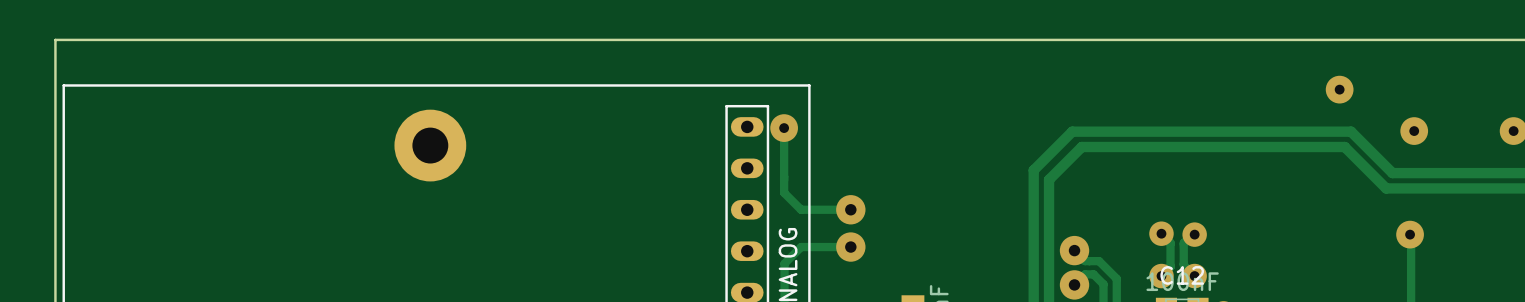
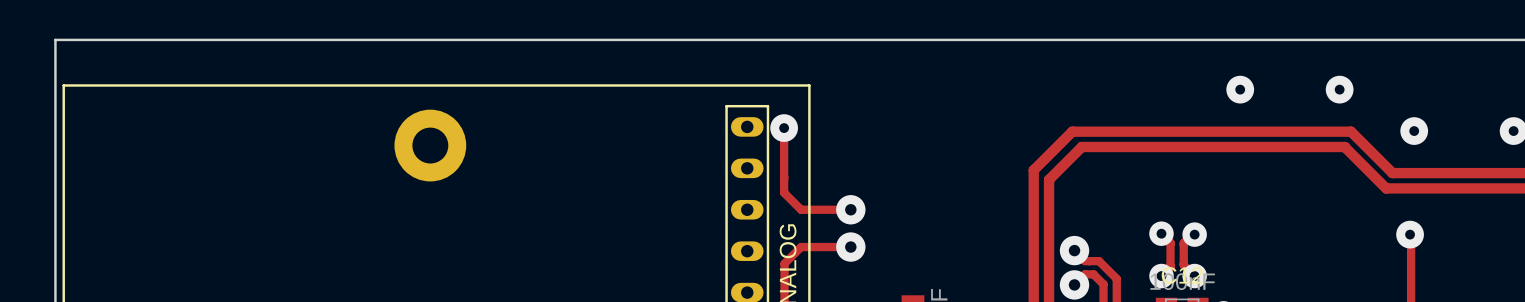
via: none -> (1240, 89)

